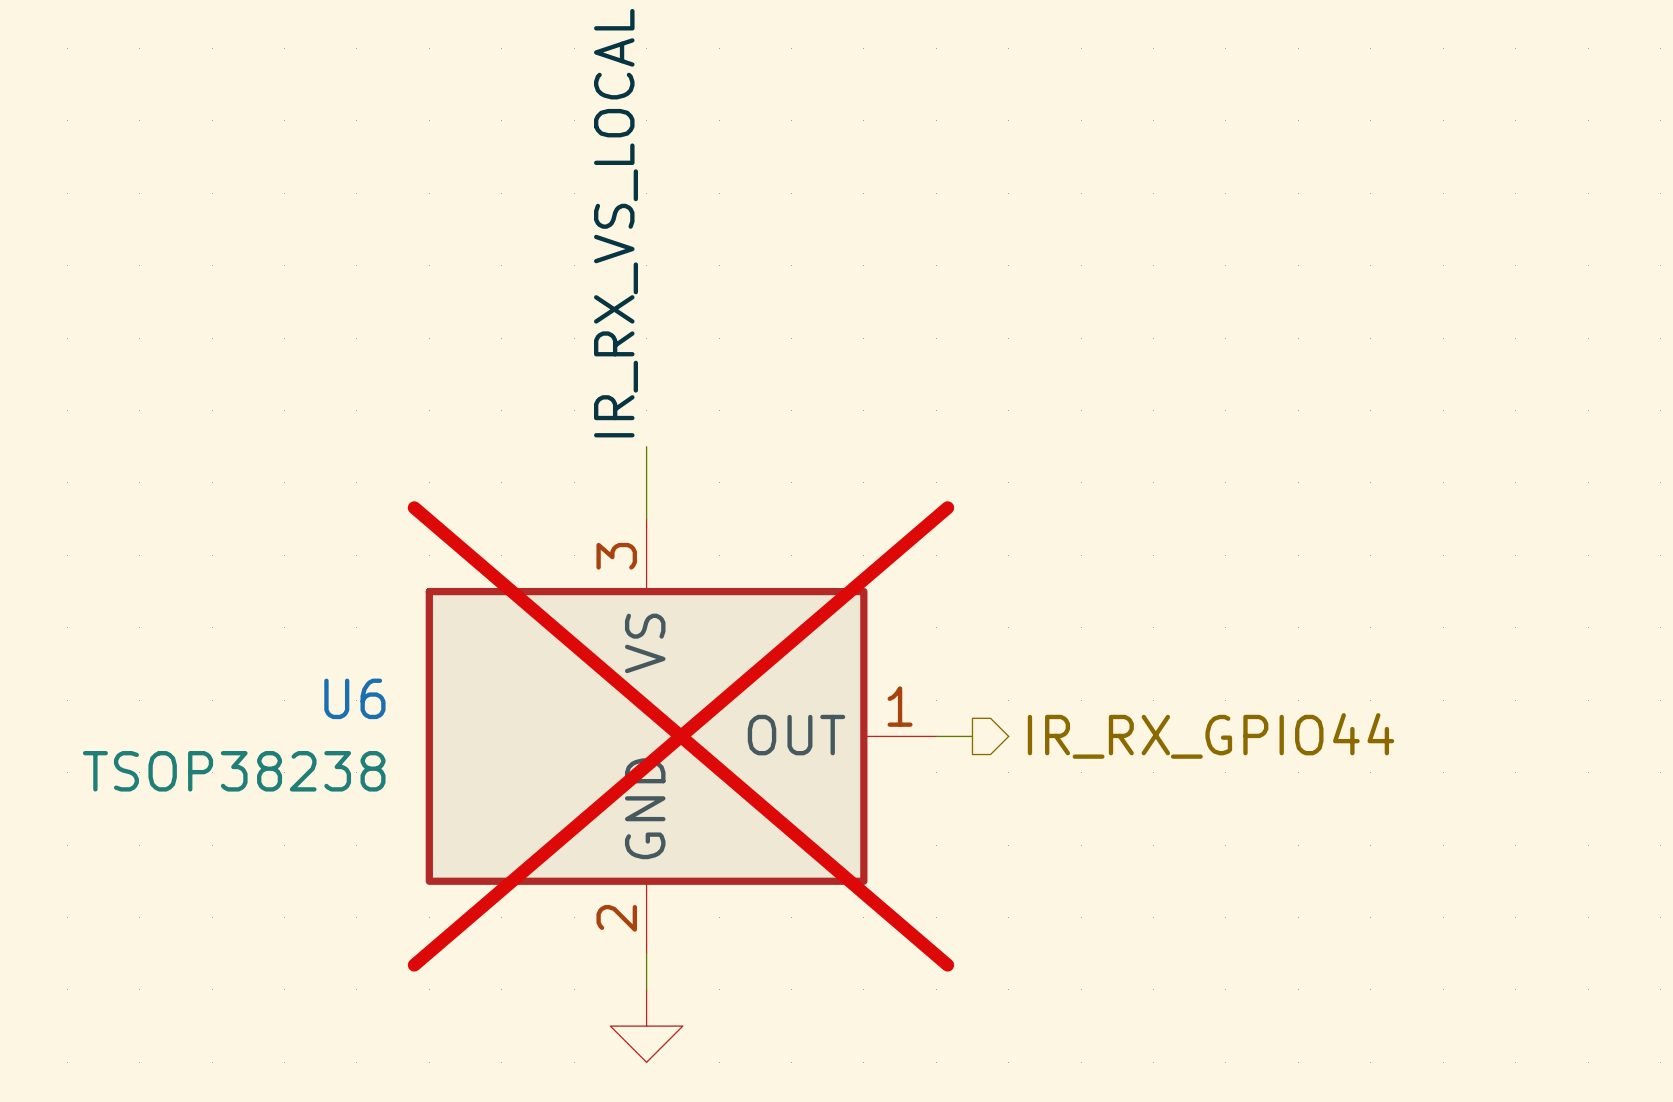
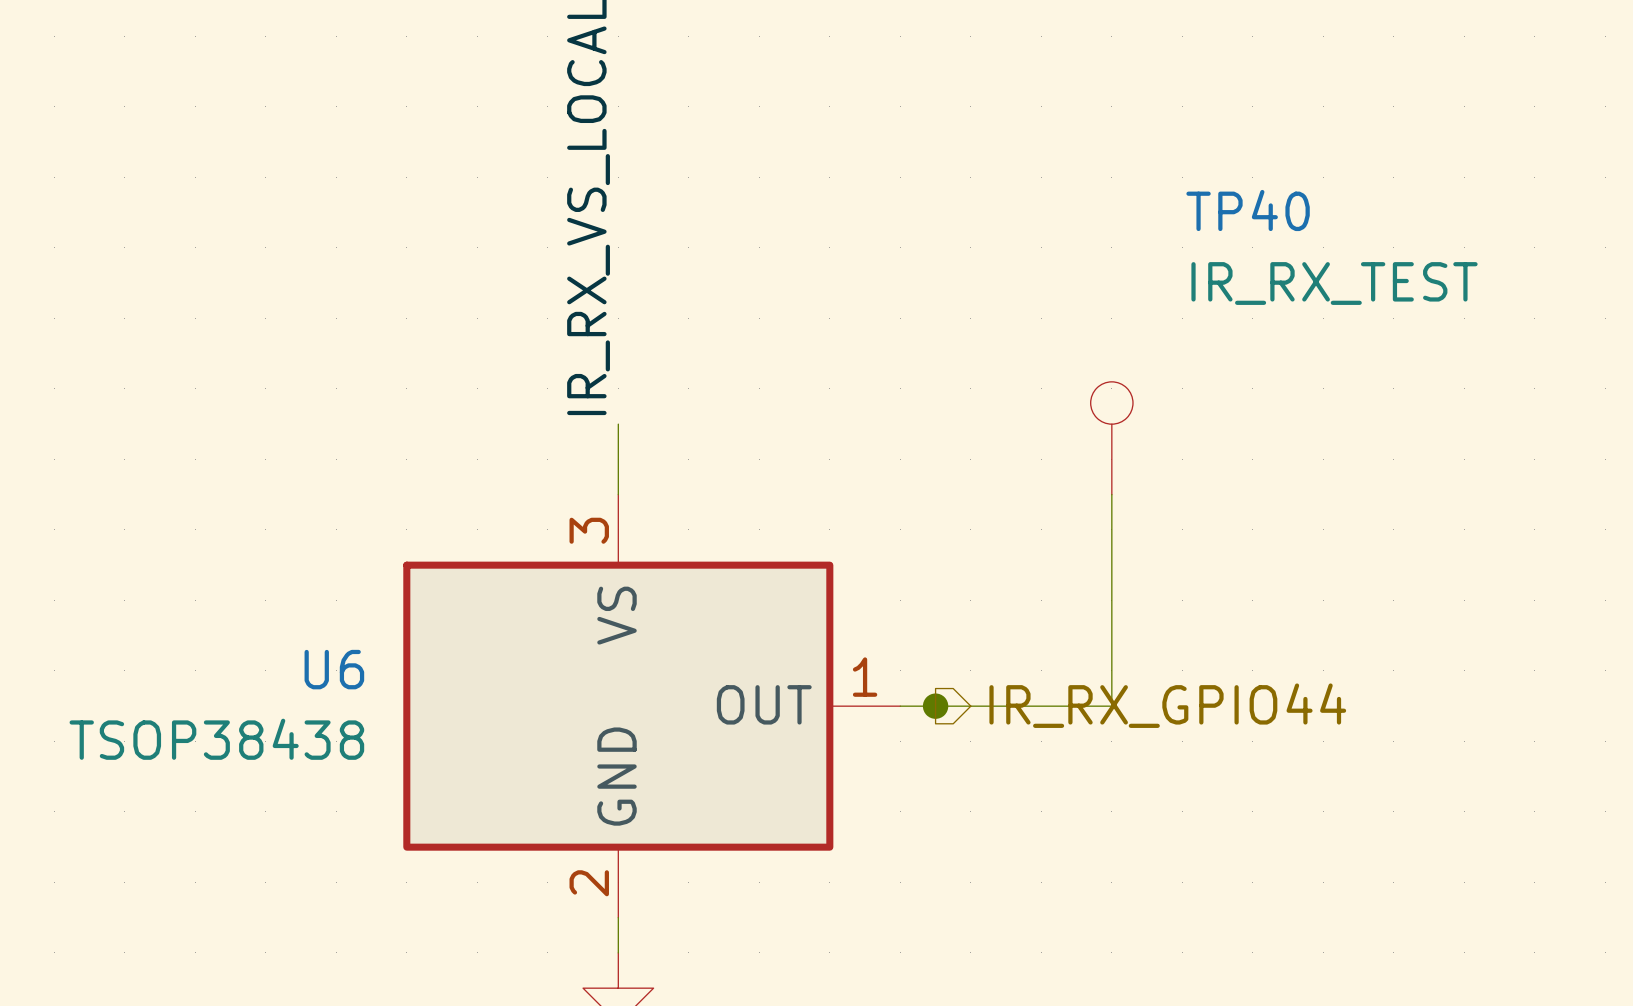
TP40: none -> IR_RX_TEST (1111, 438)
wire: none -> (1111, 494) (1111, 706) (935, 706)
U6 do-not-place cross: (680, 736) -> none
junction: none -> (935, 706)
U6 value: TSOP38238 (234, 771) -> TSOP38438 (216, 739)

